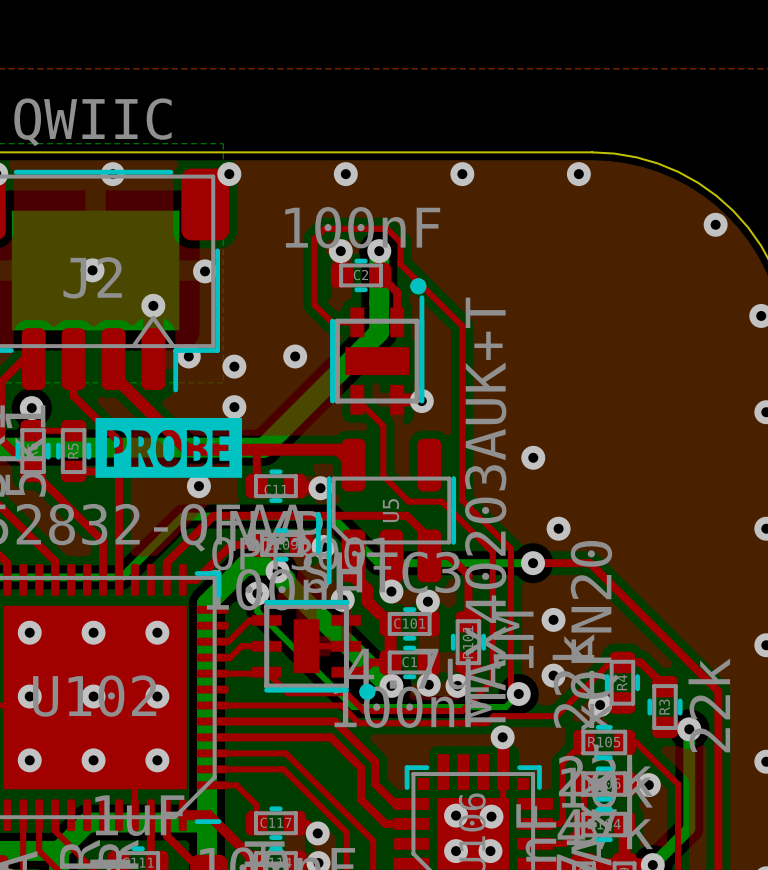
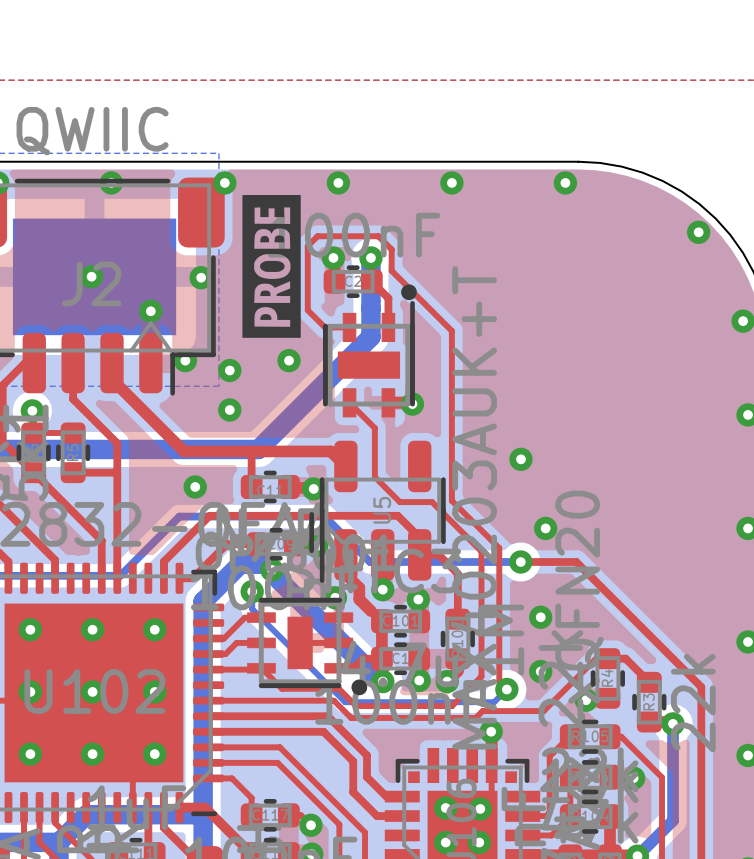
drawing: none -> [242, 195, 301, 338]
drawing: [95, 417, 243, 478] -> none

